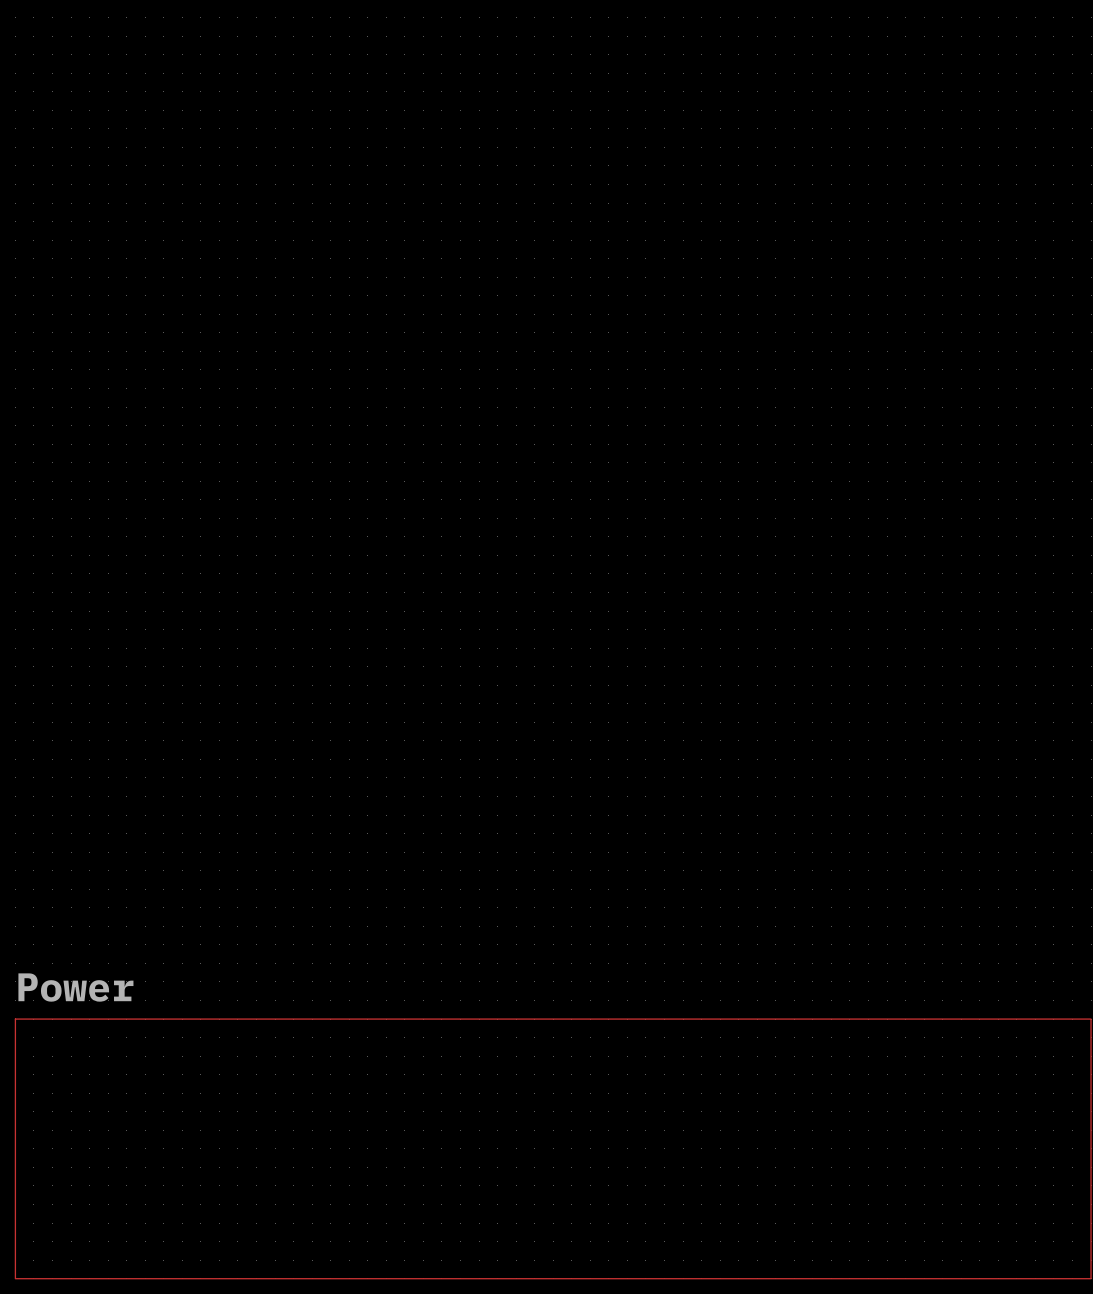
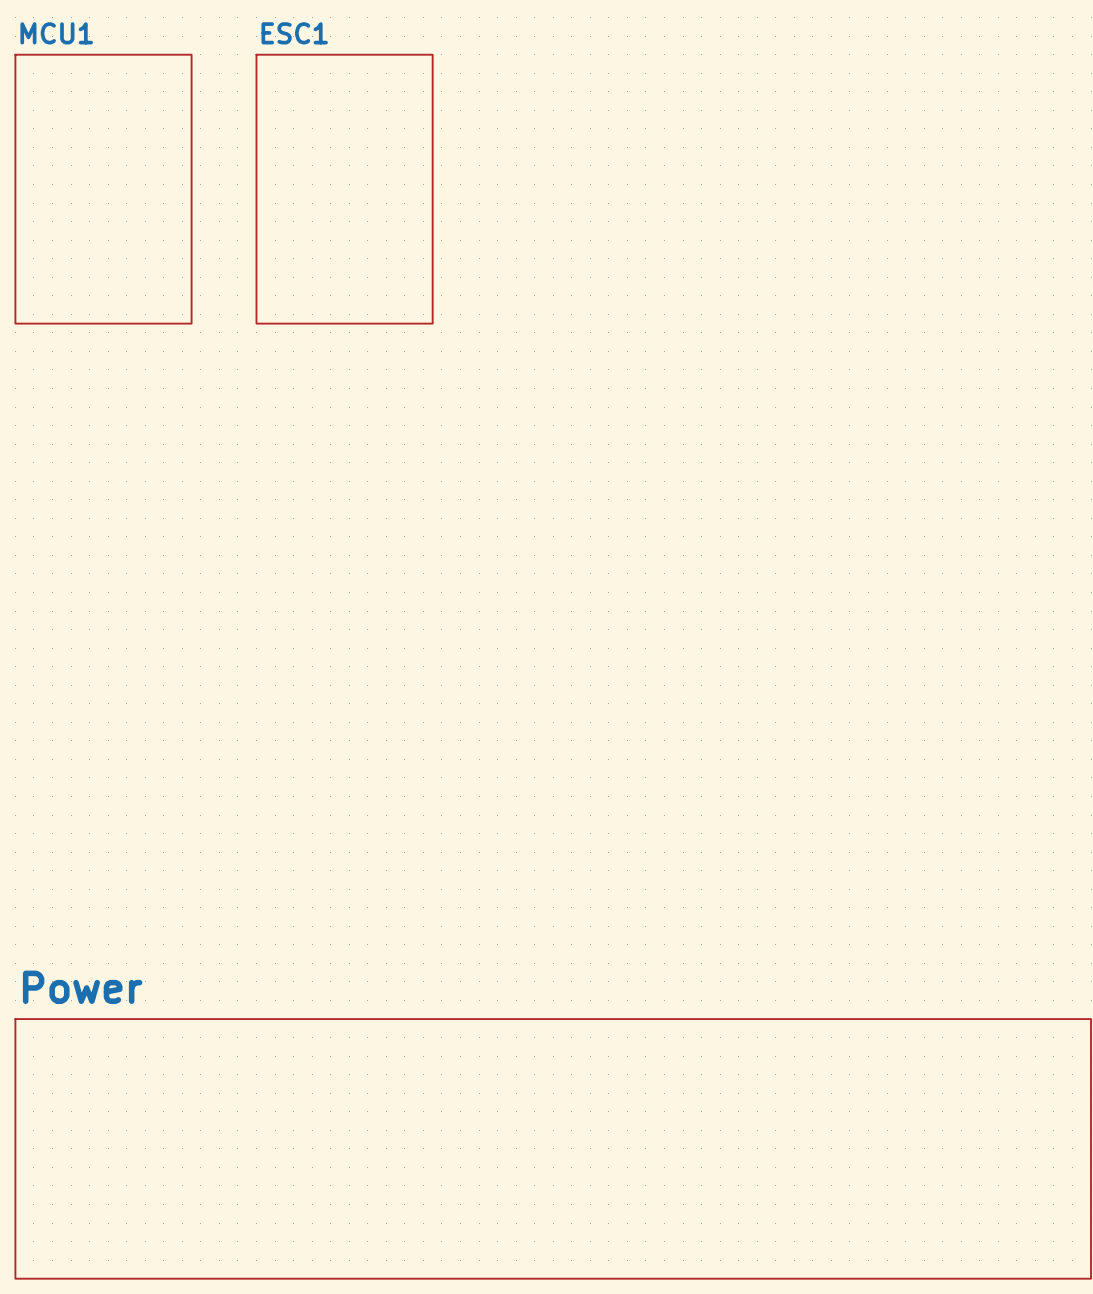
sheet MCU1: none -> (103, 189)
sheet ESC1: none -> (344, 189)

